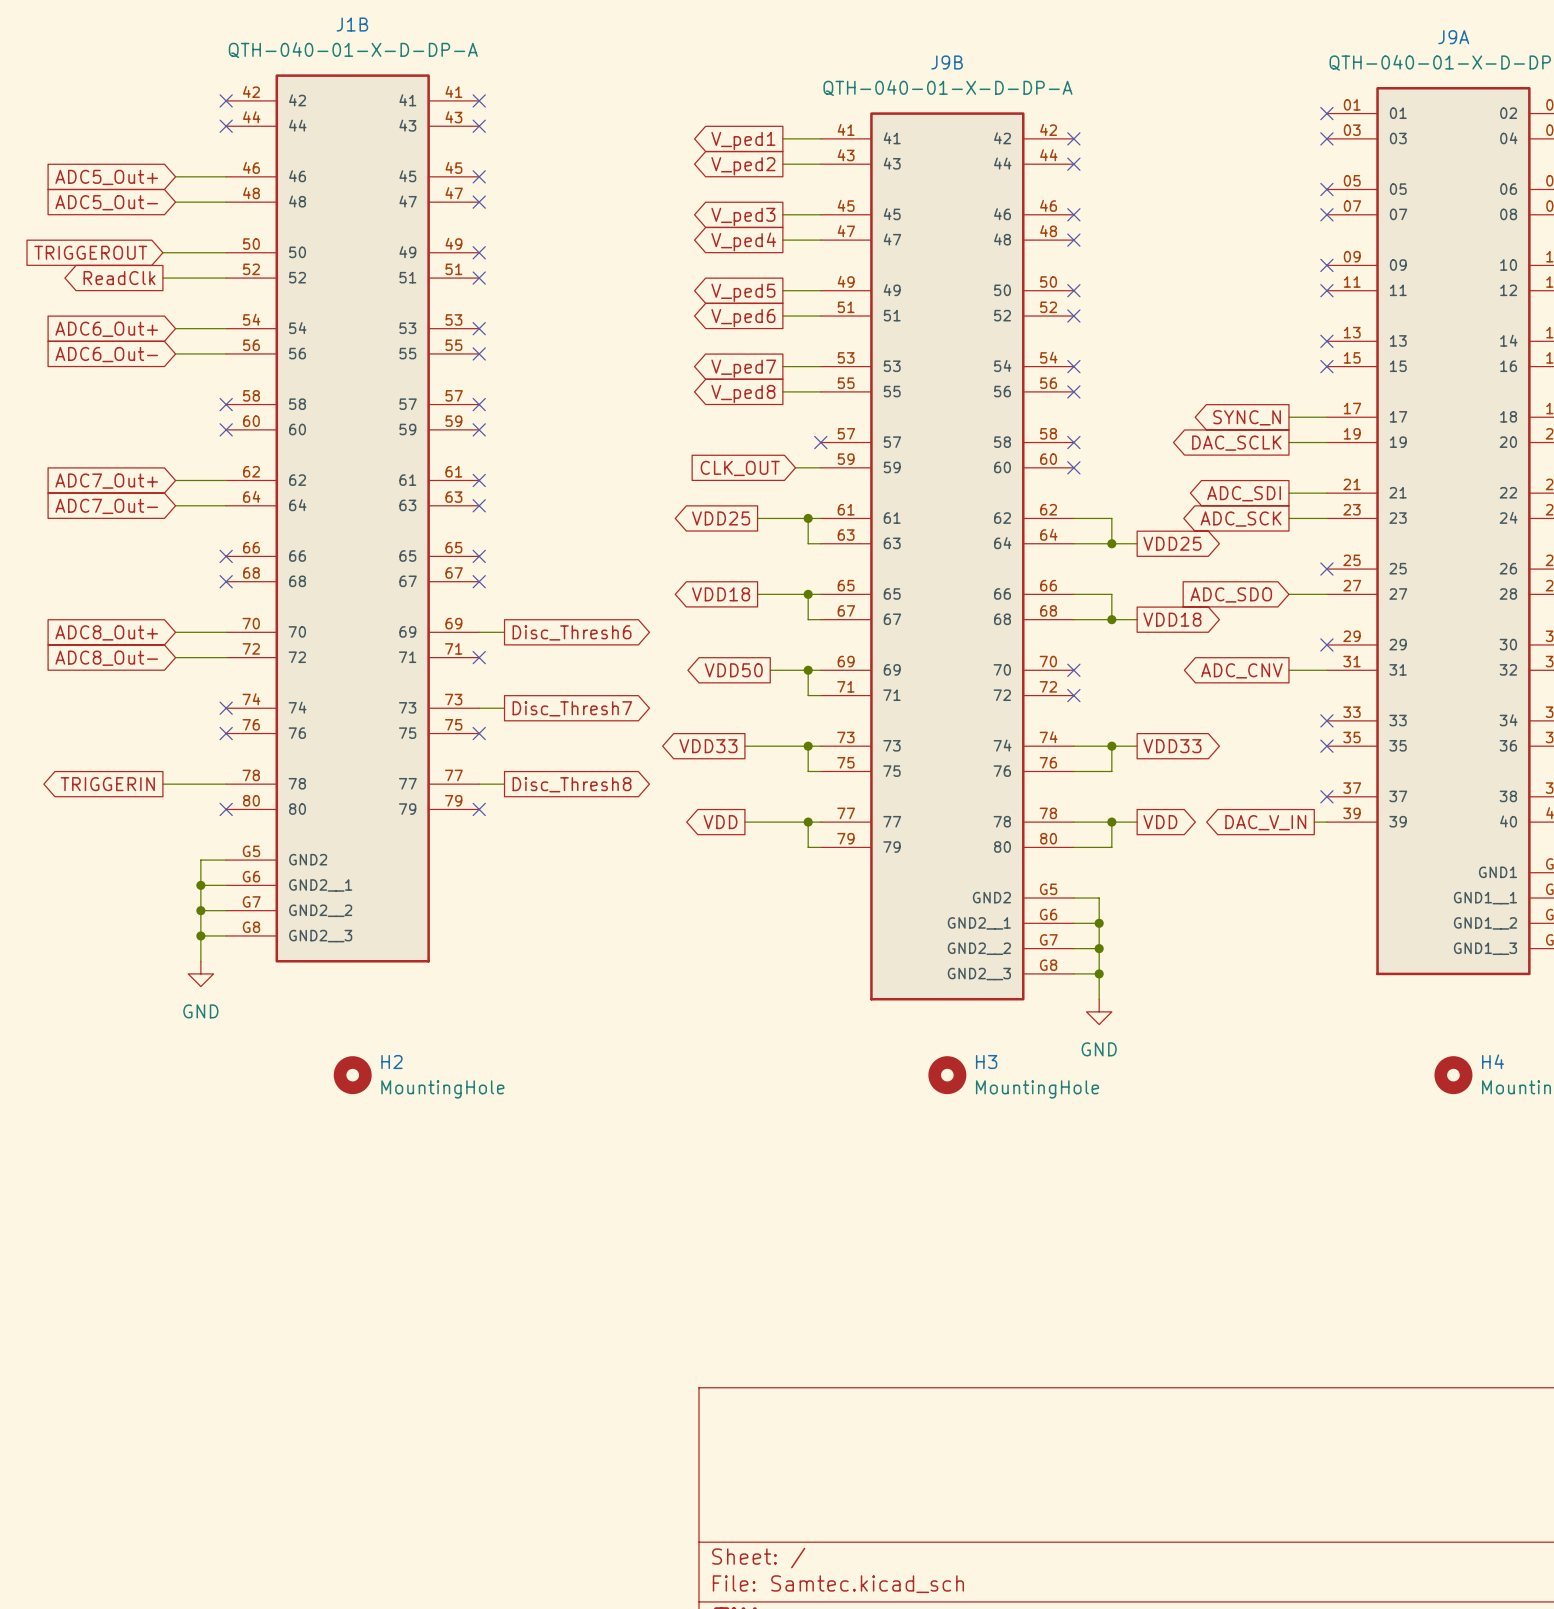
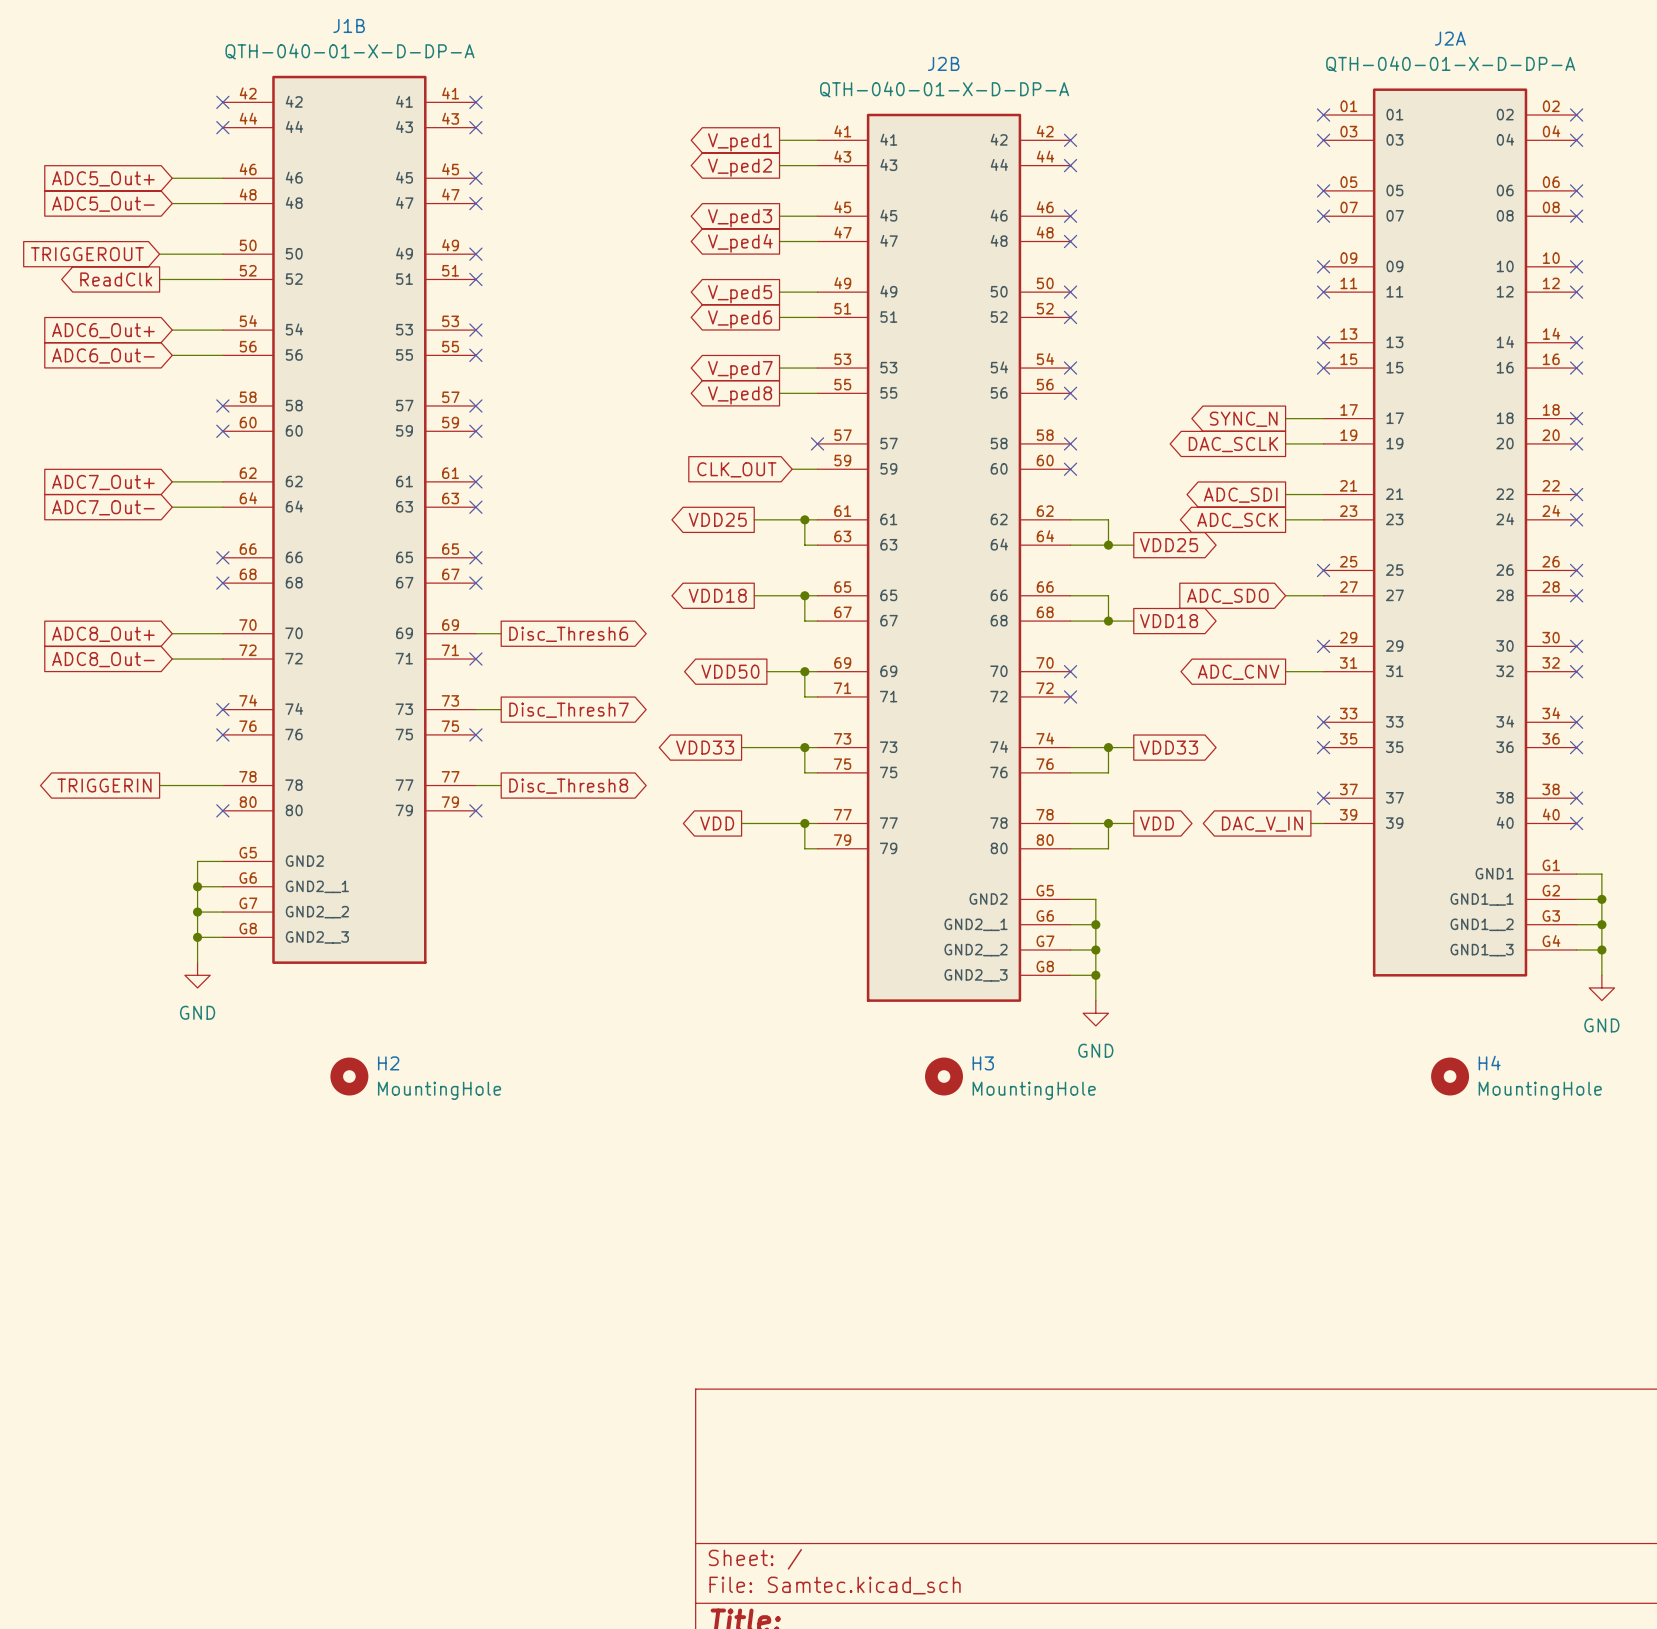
J9A name: J9A (1453, 37) -> J2A (1450, 38)
J9B name: J9B (947, 62) -> J2B (943, 63)

